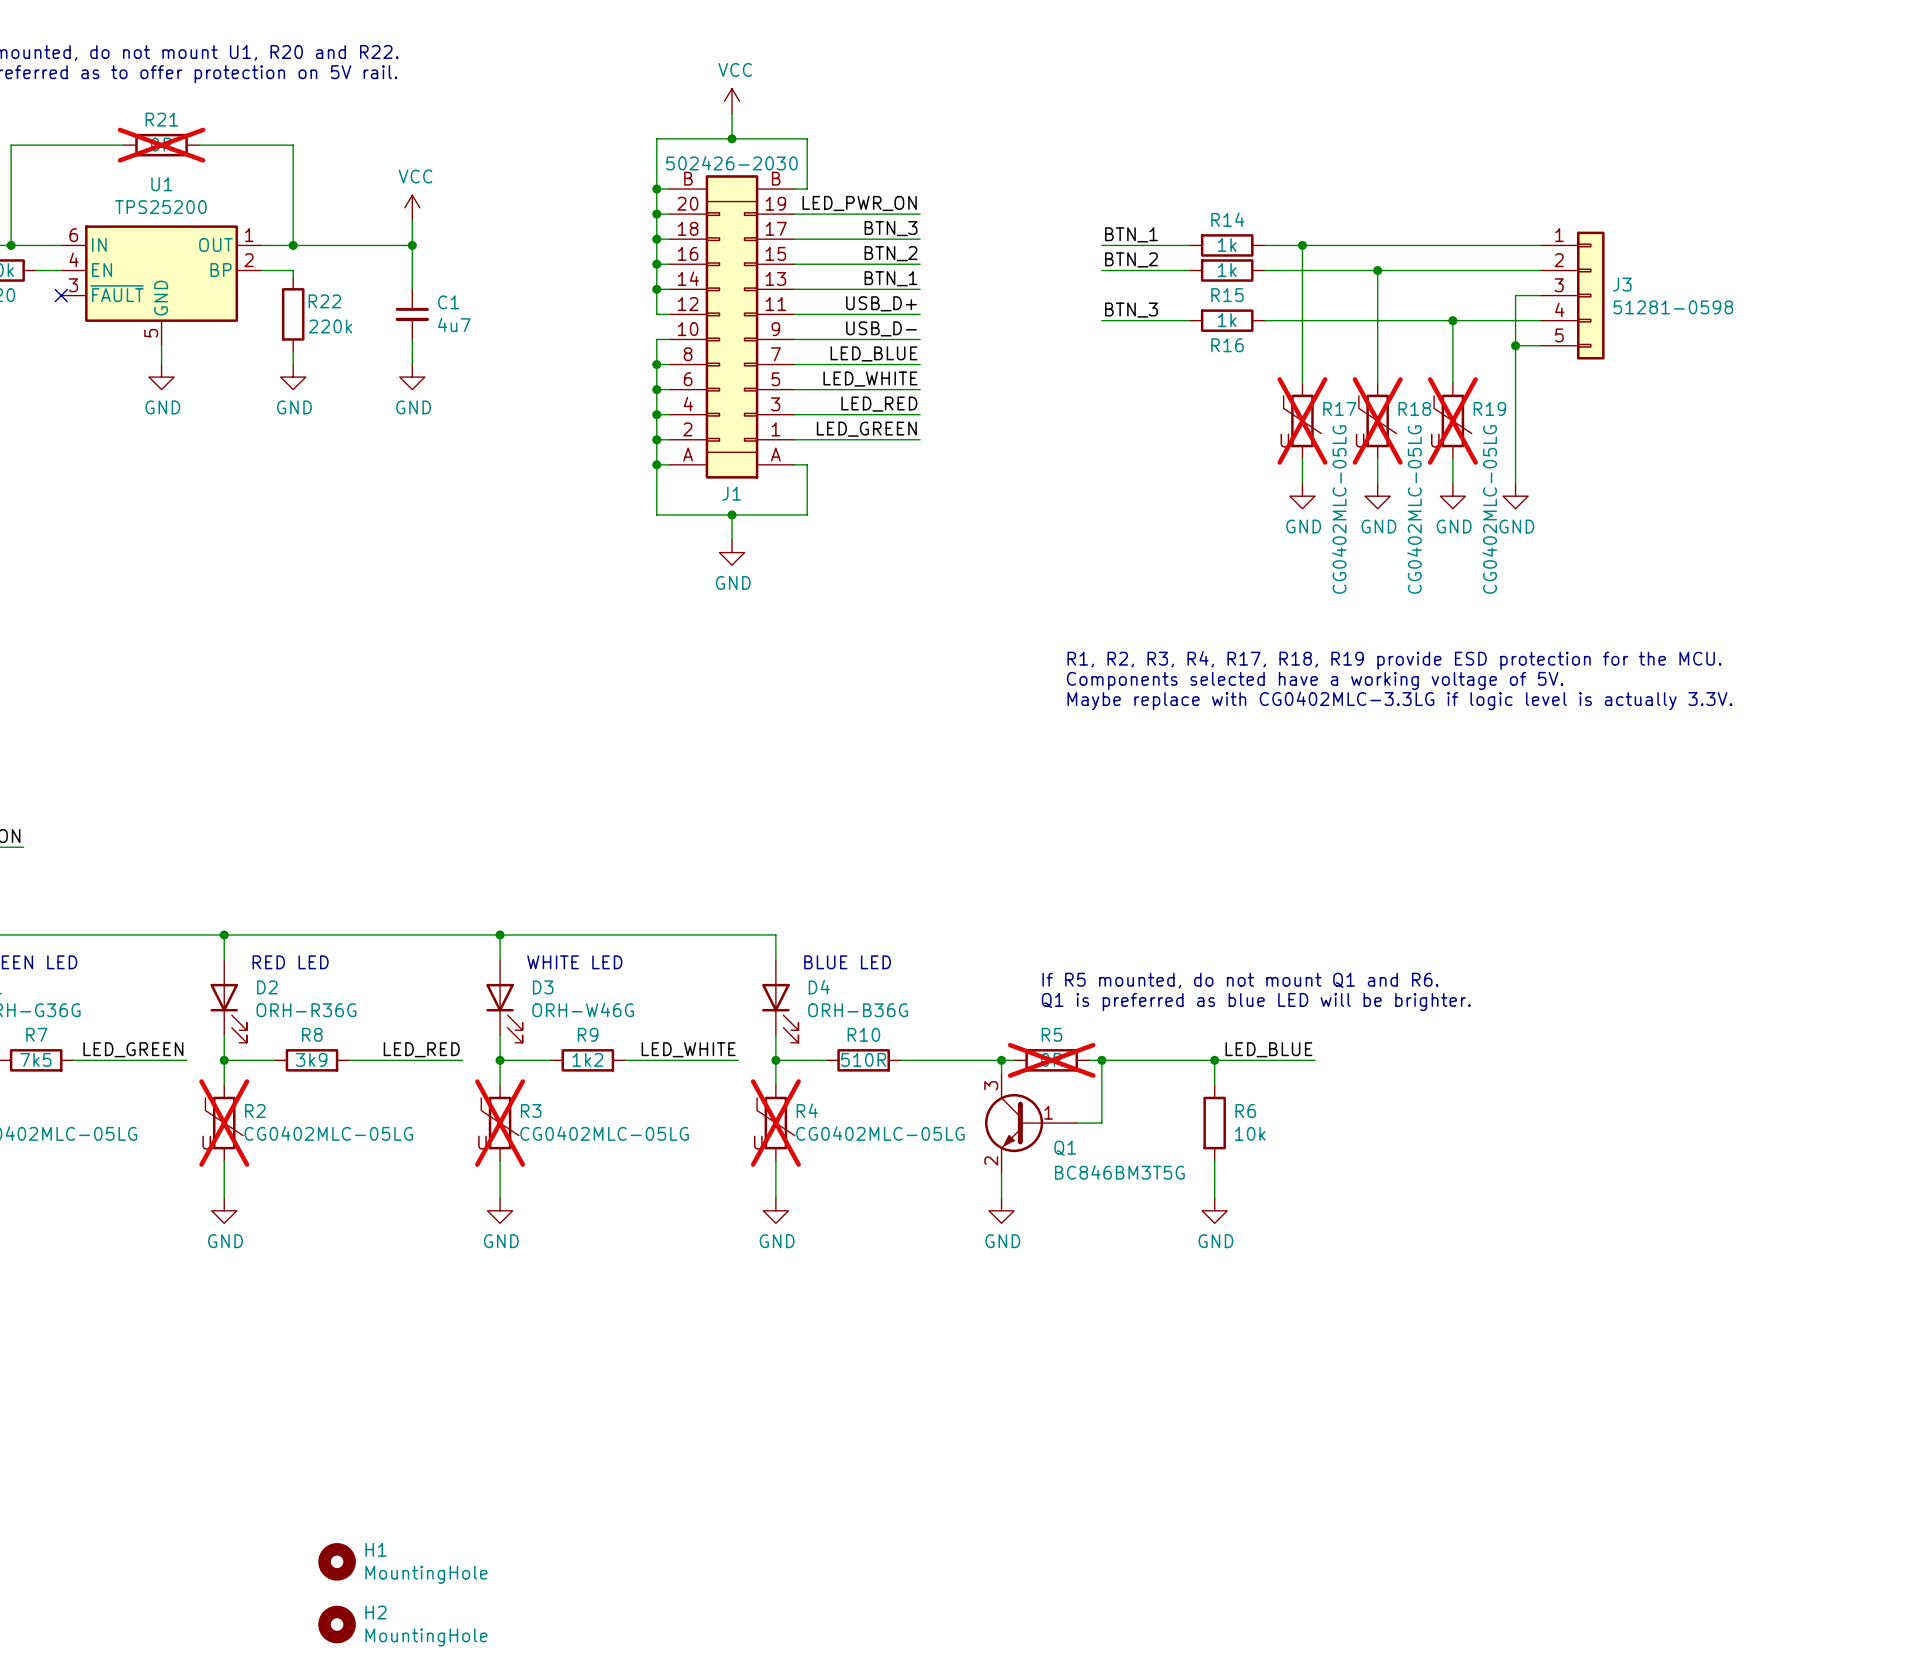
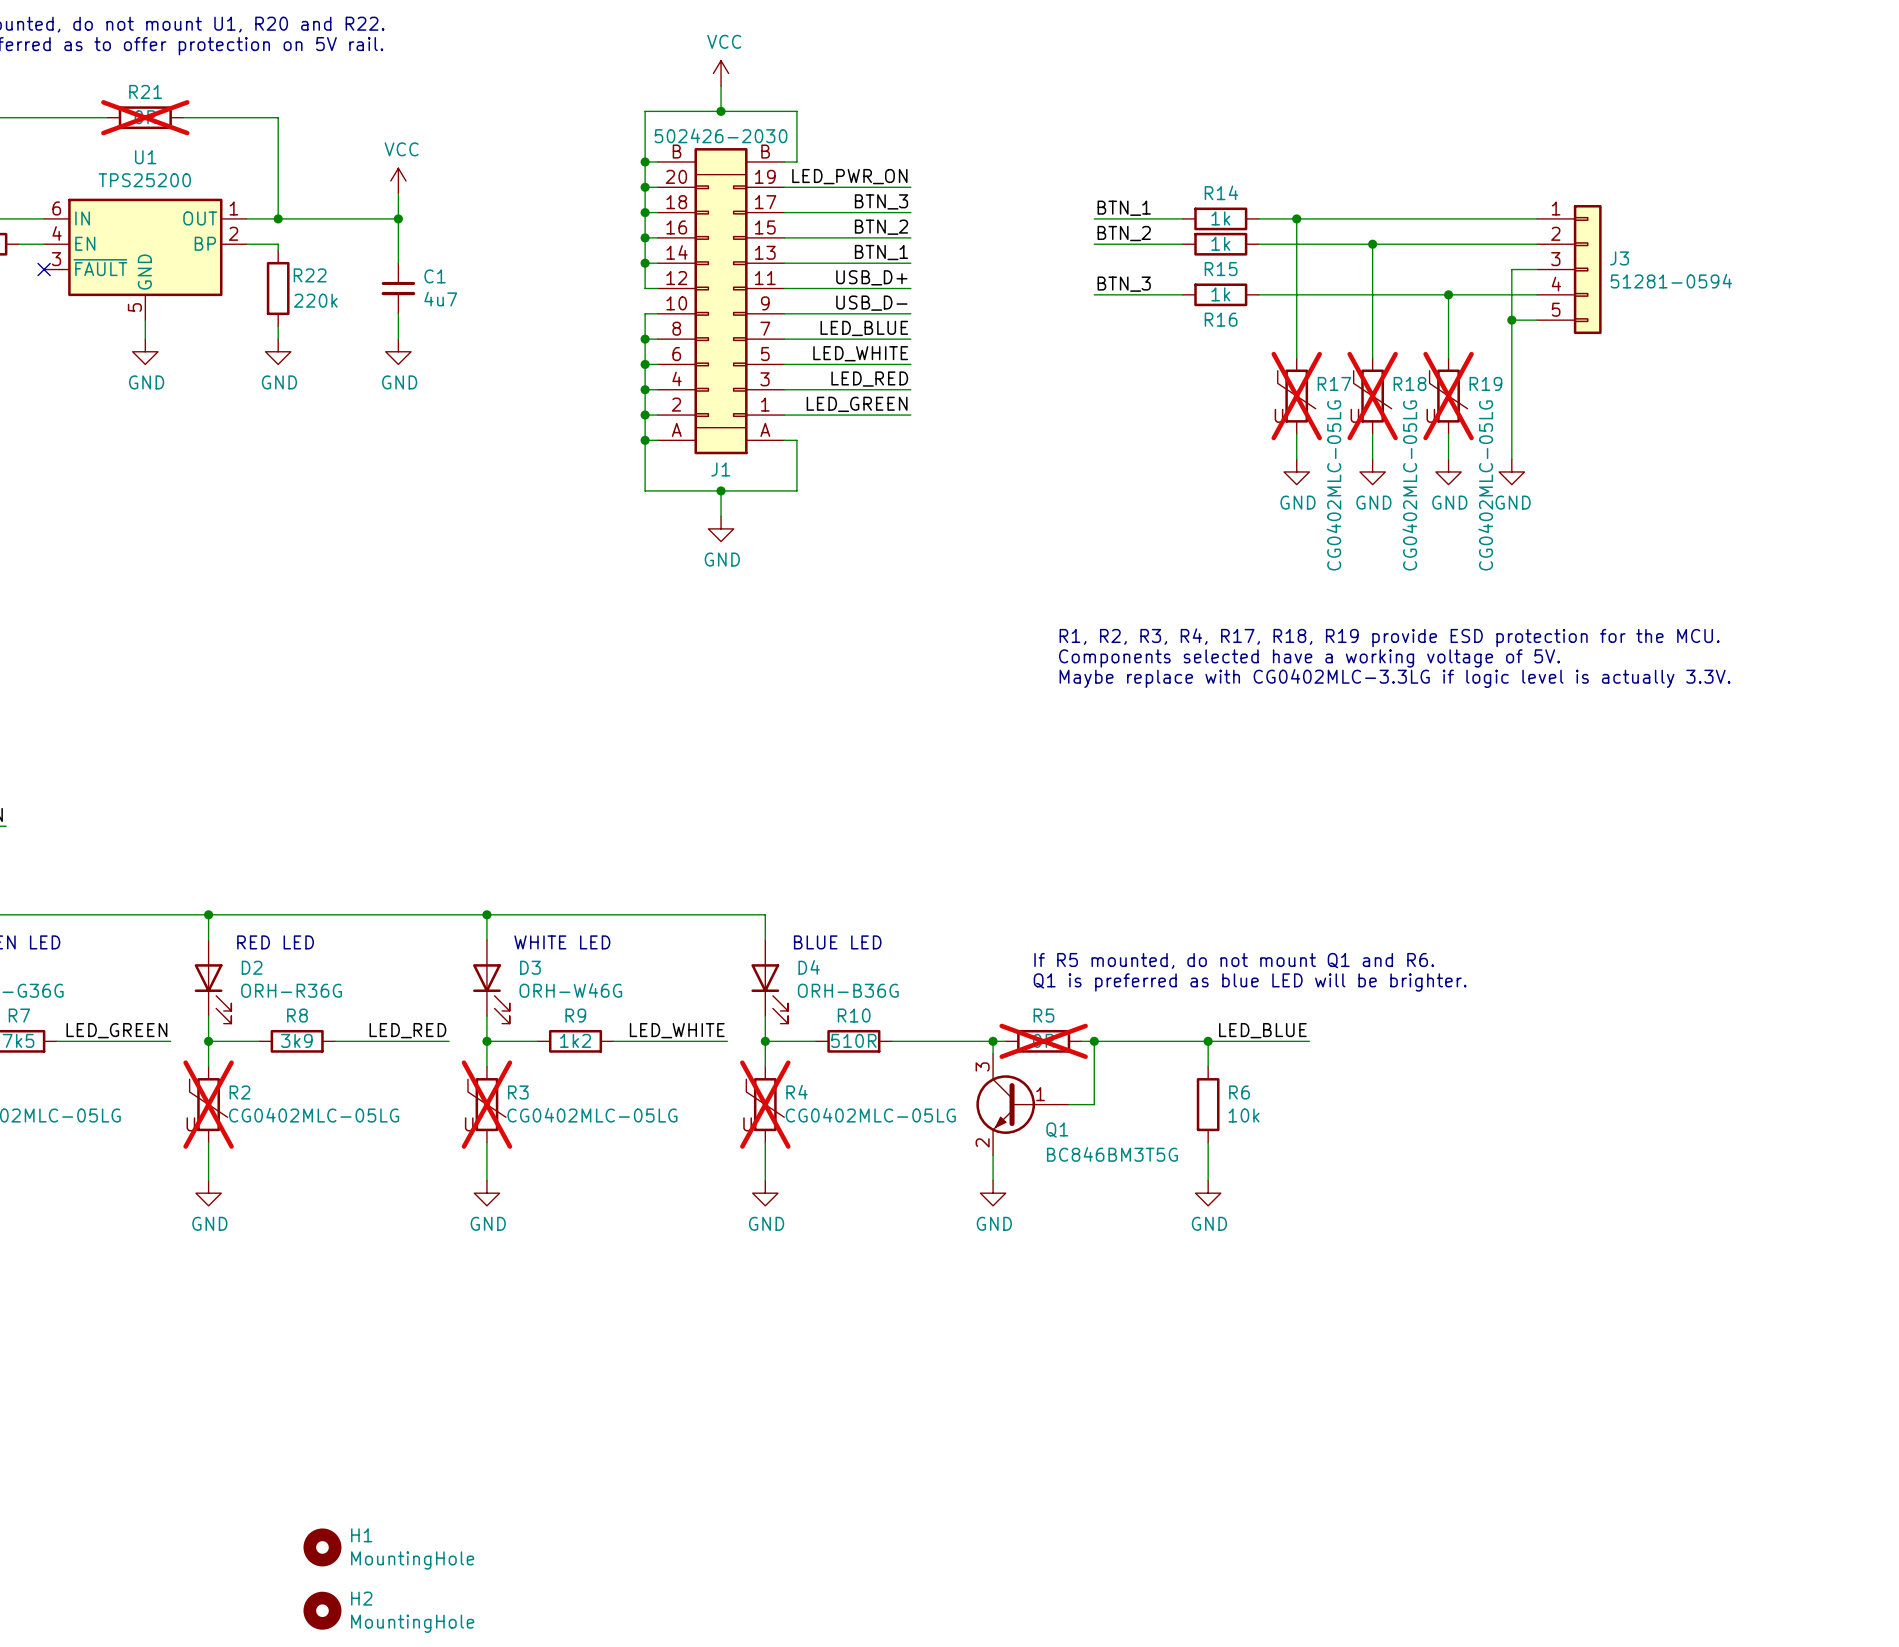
J3 value: 51281-0598 (1673, 307) -> 51281-0594 (1671, 281)

